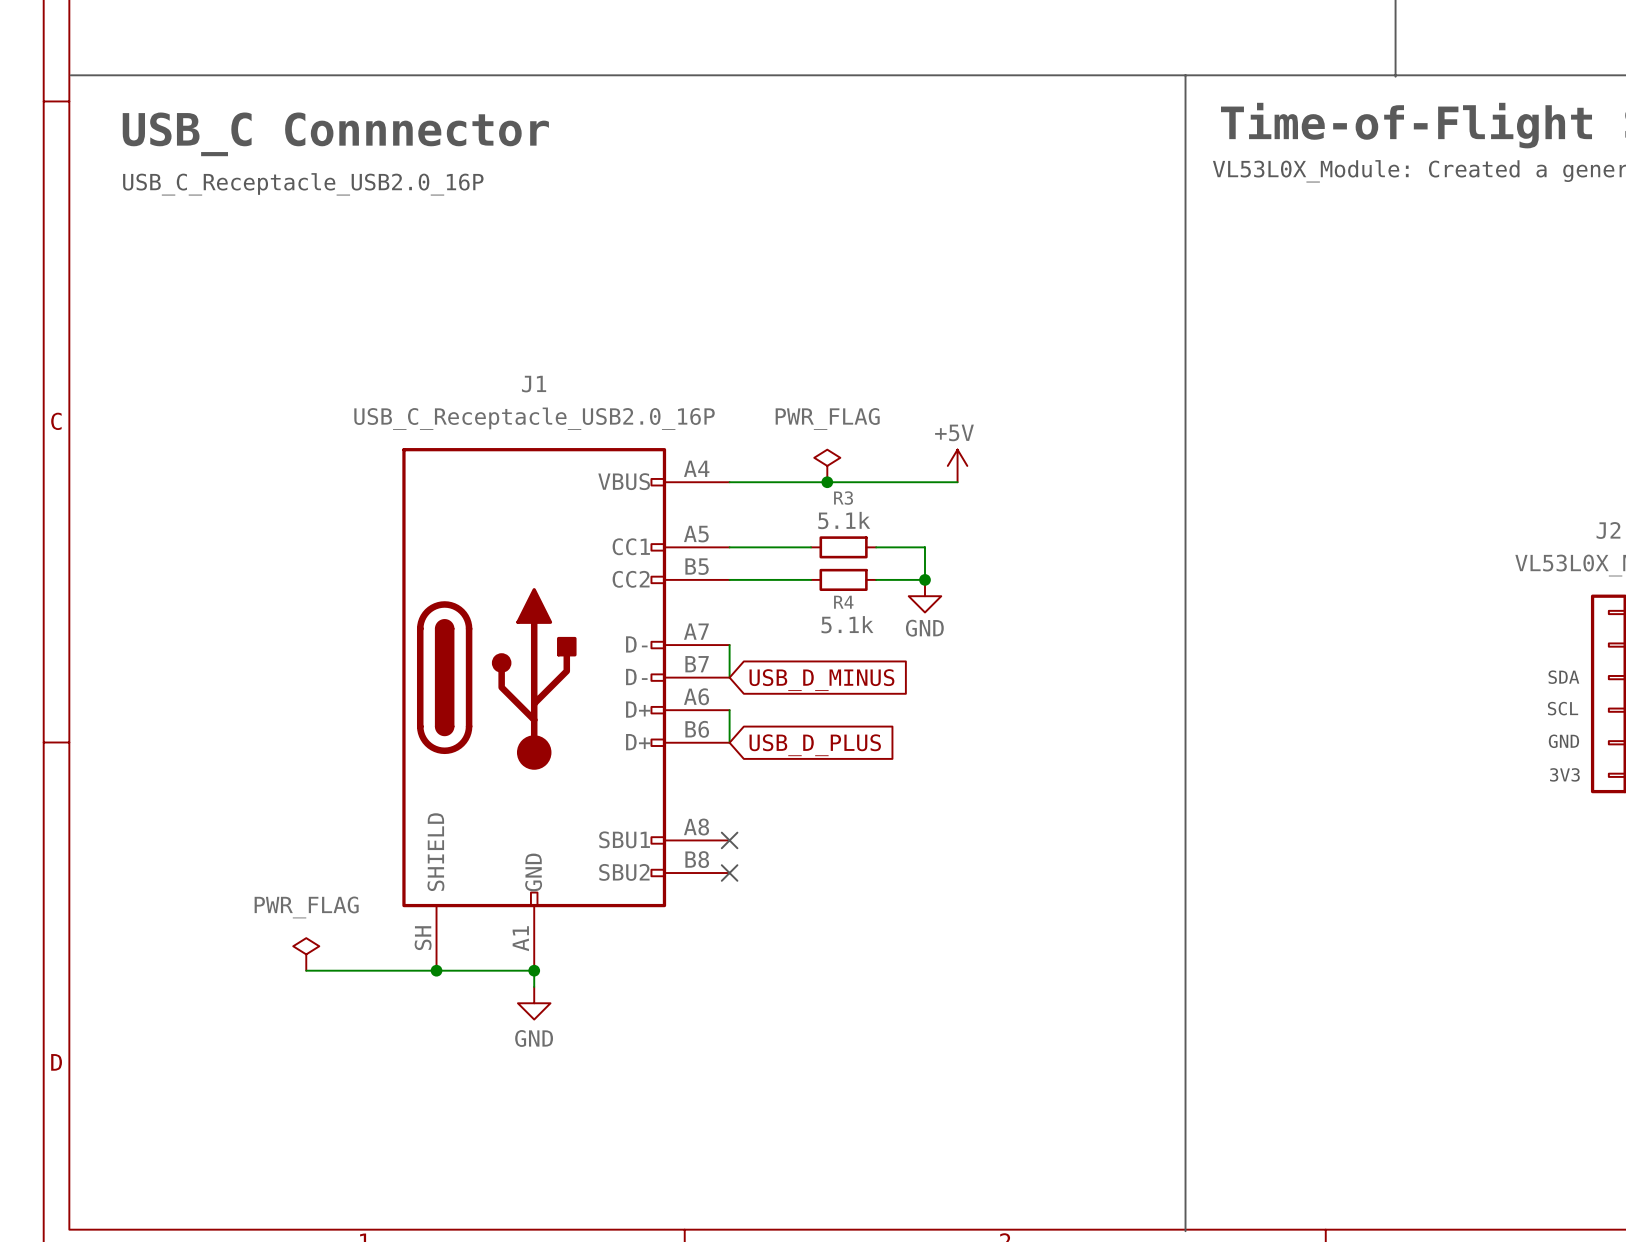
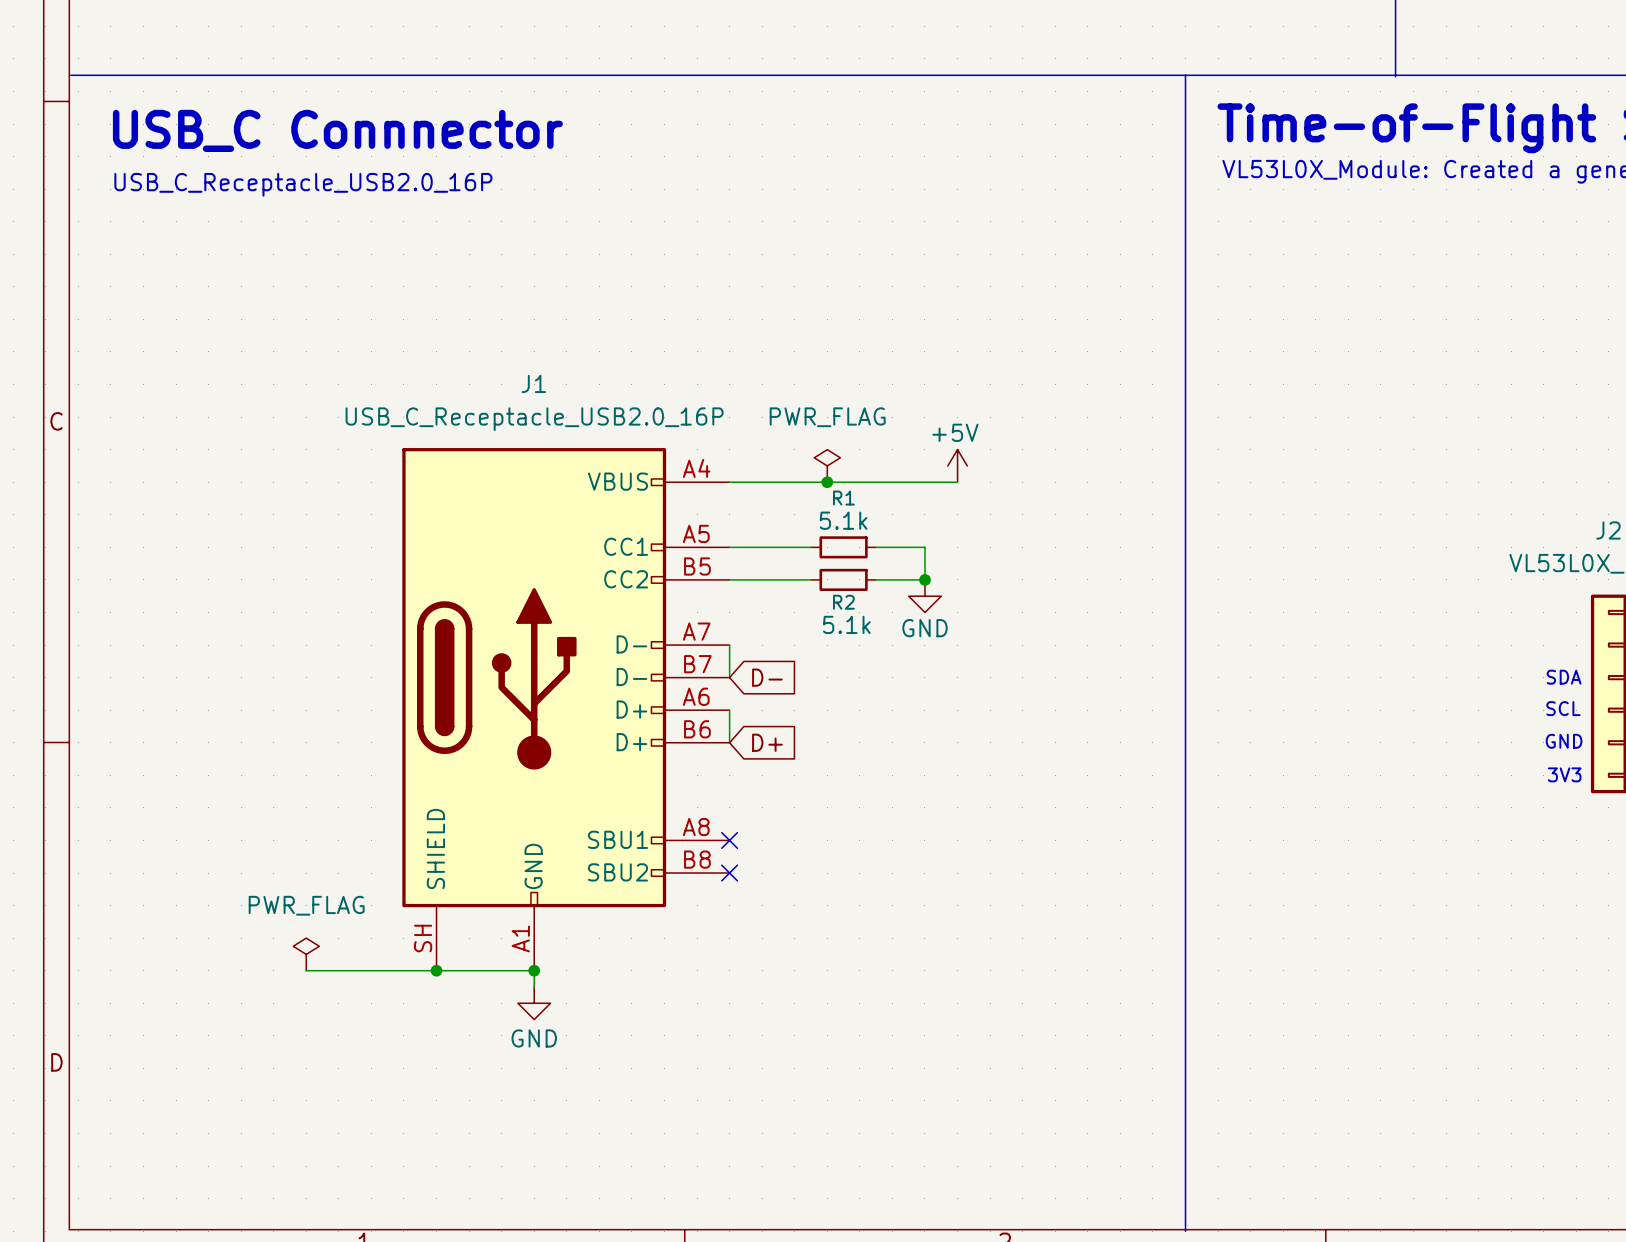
R3 name: R3 (843, 498) -> R1 (843, 498)
R4 name: R4 (843, 602) -> R2 (843, 602)
global label: USB_D_MINUS (821, 680) -> D- (767, 677)
global label: USB_D_PLUS (815, 745) -> D+ (767, 742)

